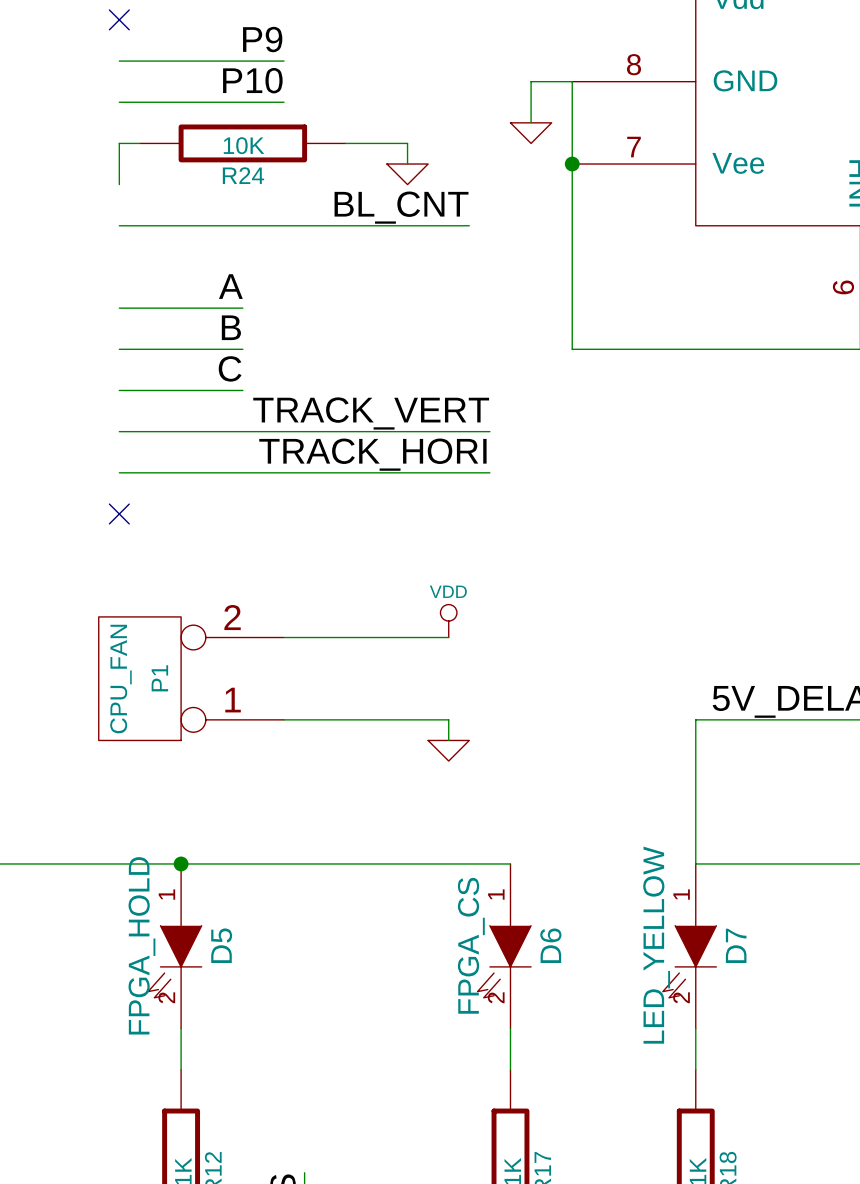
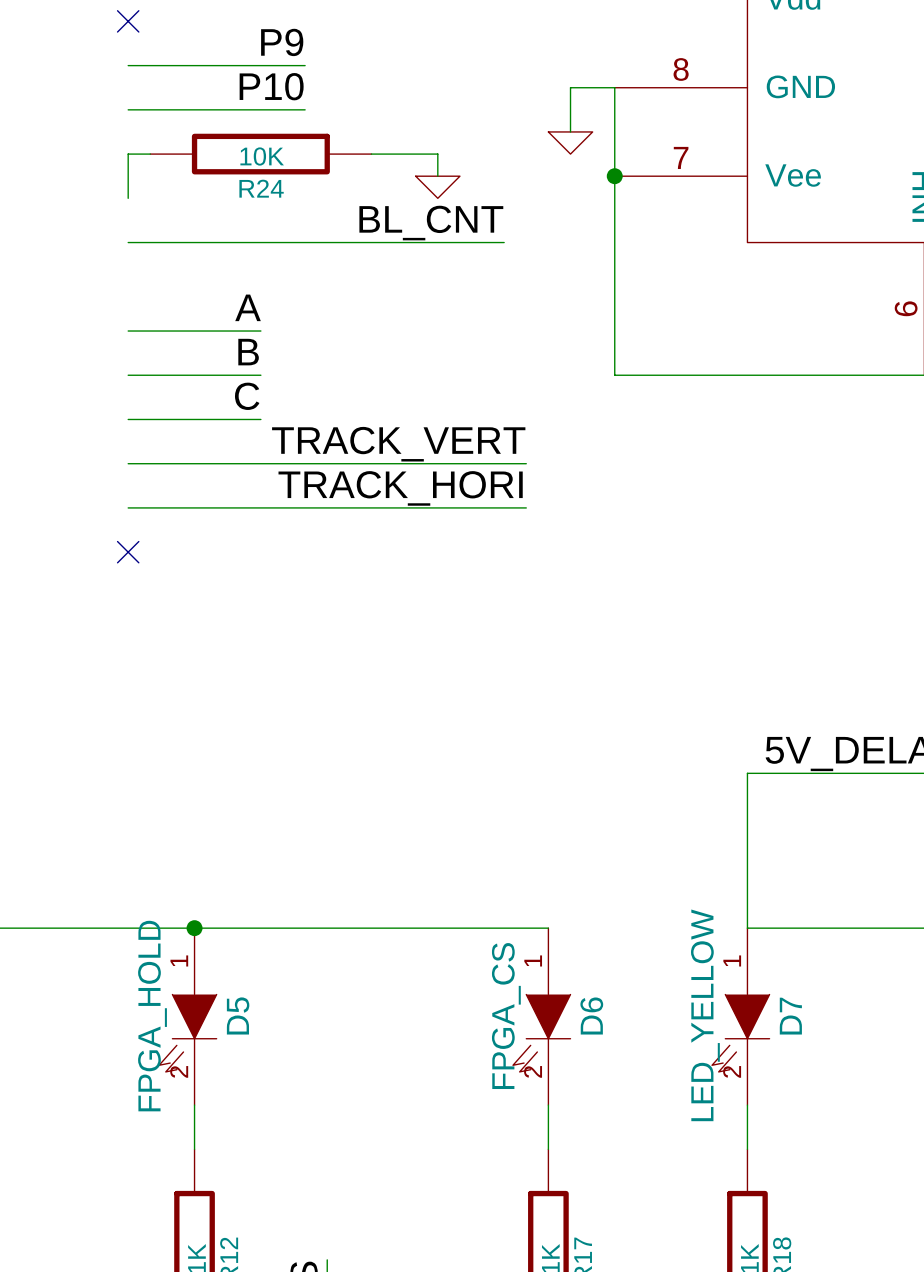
power symbol: VDD (448, 621) -> none
wire: (284, 637) (448, 637) -> none
P1: CPU_FAN (191, 678) -> none
wire: (284, 719) (448, 719) (448, 740) -> none
power symbol: (448, 750) -> none

